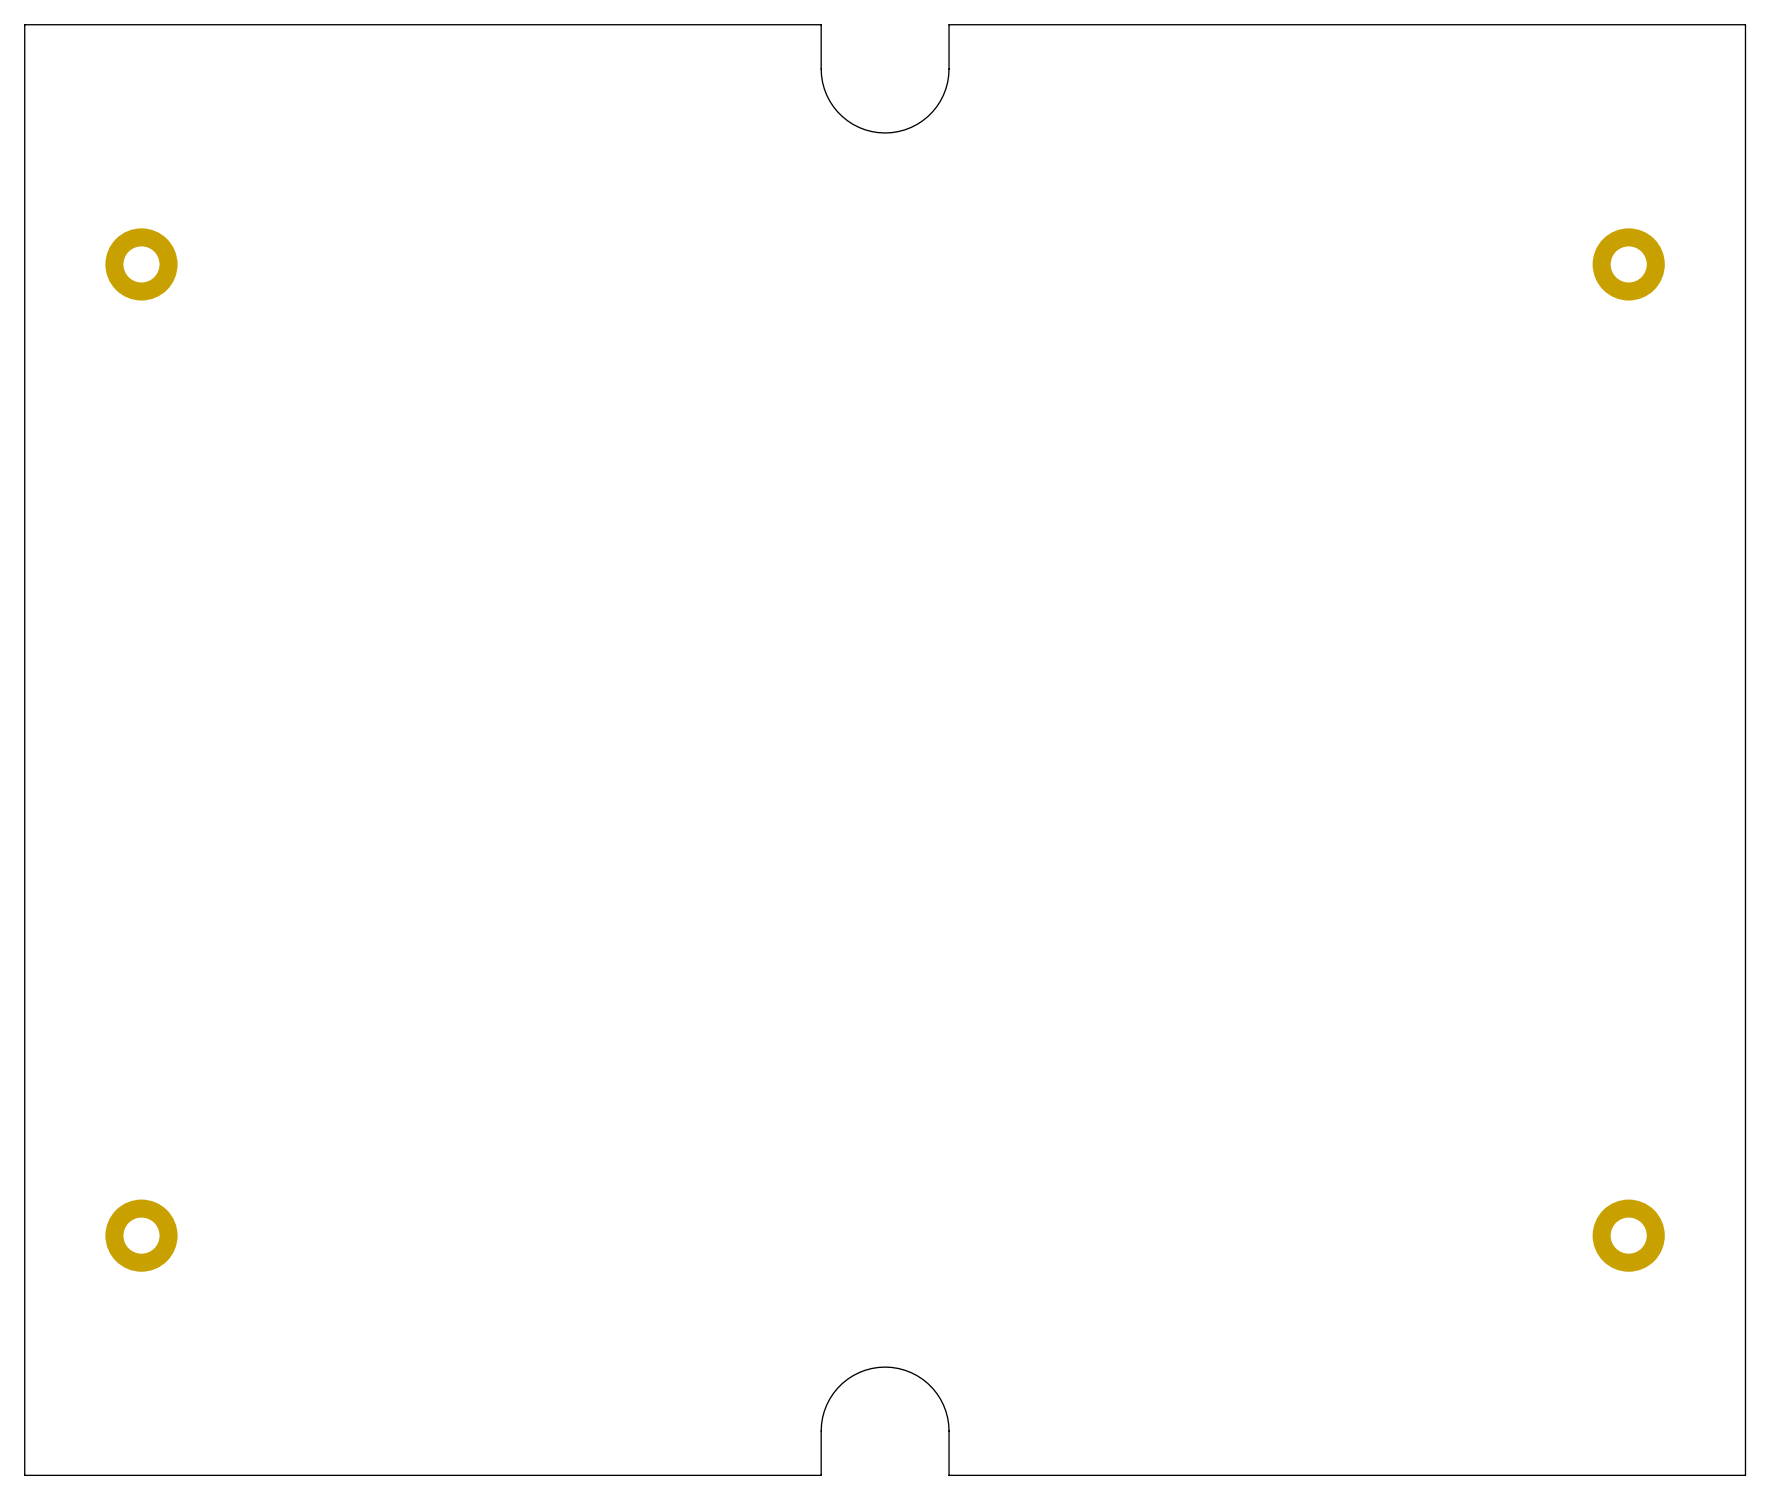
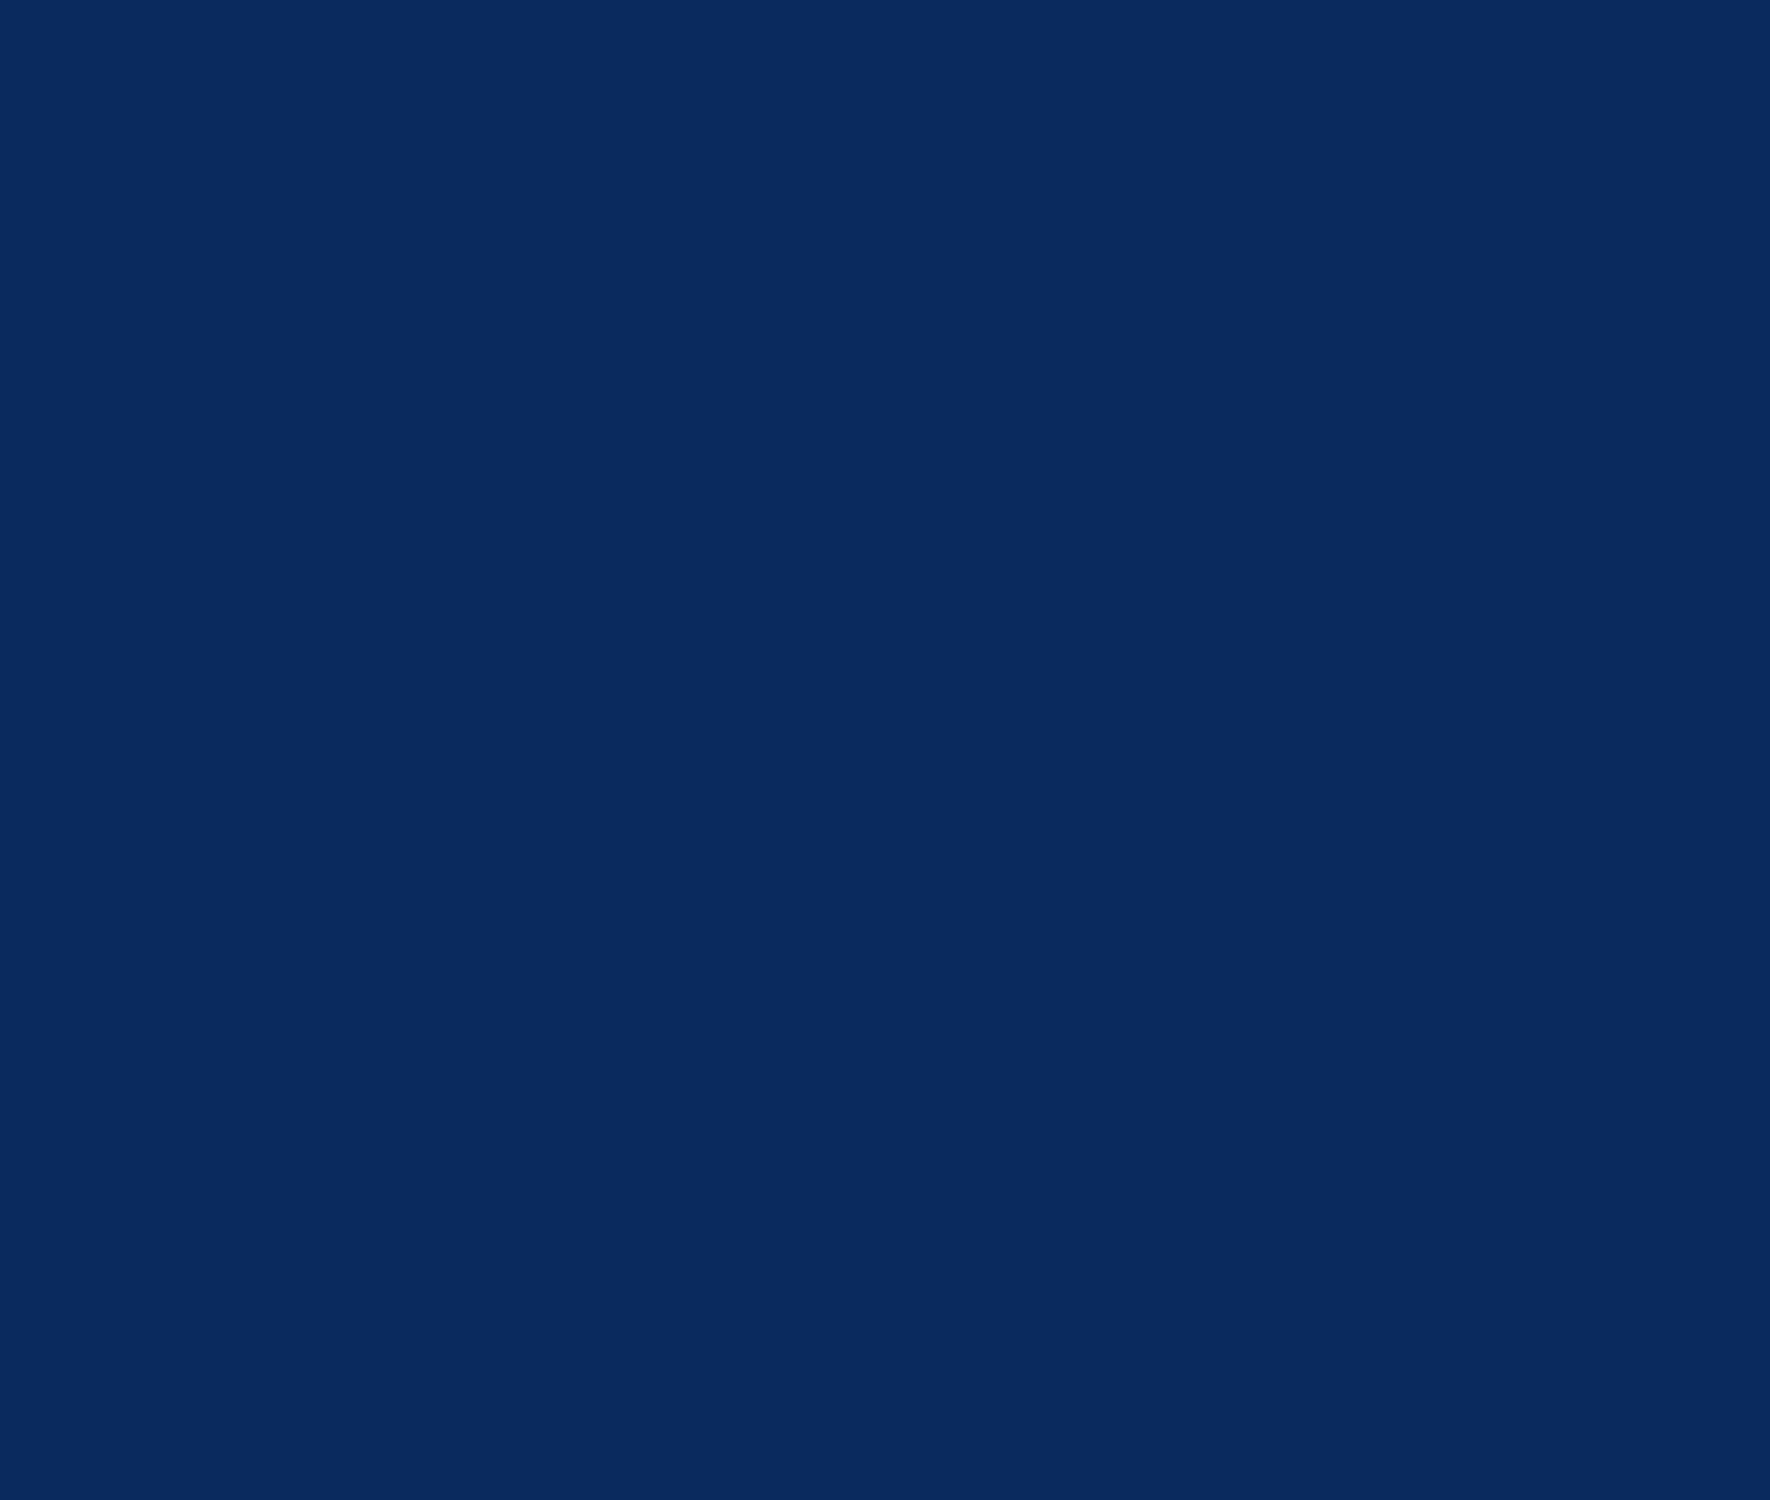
board edge: (24, 24) (821, 24) (821, 75) (829, 101) (842, 116) (853, 124) (871, 131) (885, 132) (904, 129) (917, 124) (927, 116) (940, 101) (948, 75) (949, 24) (1745, 24) (1745, 1475) (949, 1475) (948, 1424) (940, 1399) (927, 1383) (917, 1375) (898, 1368) (885, 1367) (871, 1368) (853, 1375) (842, 1383) (829, 1399) (821, 1424) (821, 1475) (24, 1475) (24, 24) -> none
part: (141, 264) -> none
part: (1628, 264) -> none
part: (141, 1235) -> none
part: (1628, 1235) -> none

